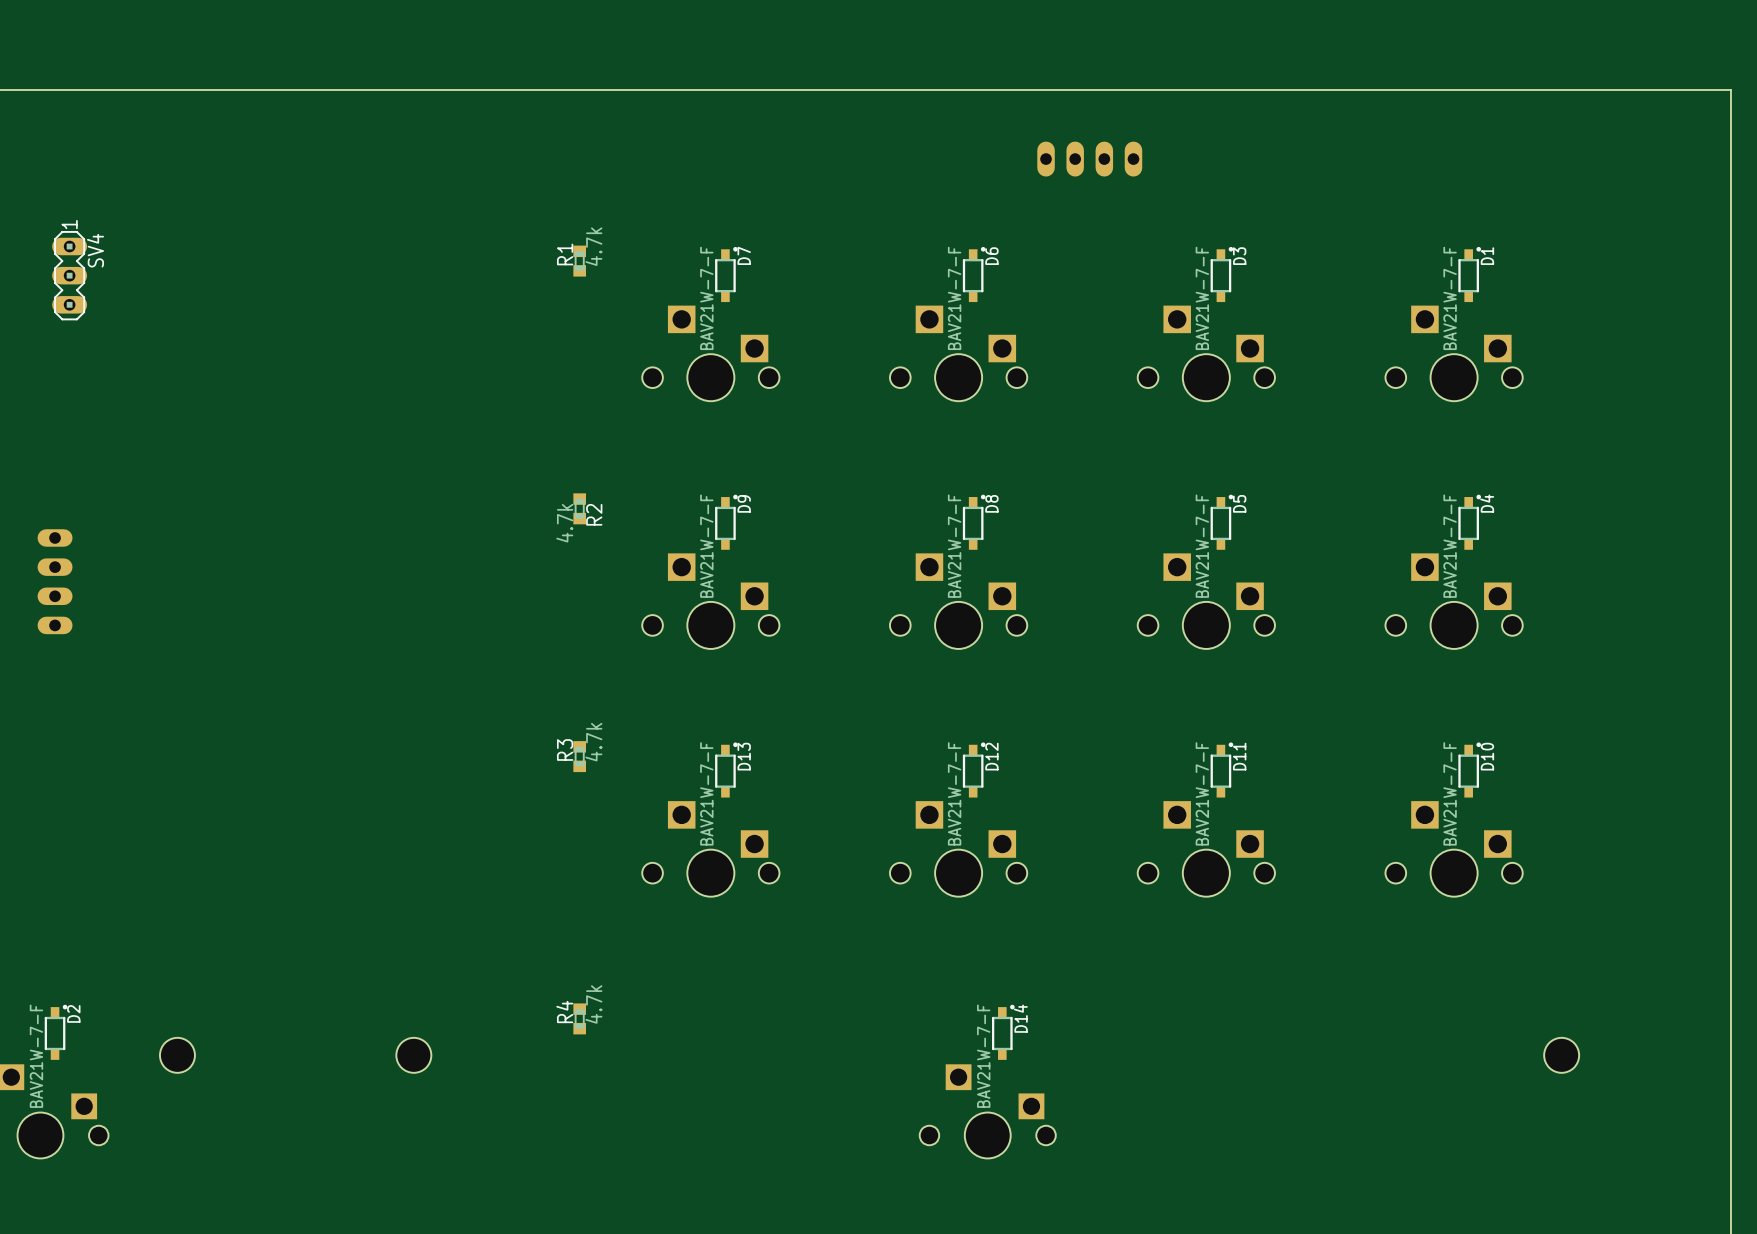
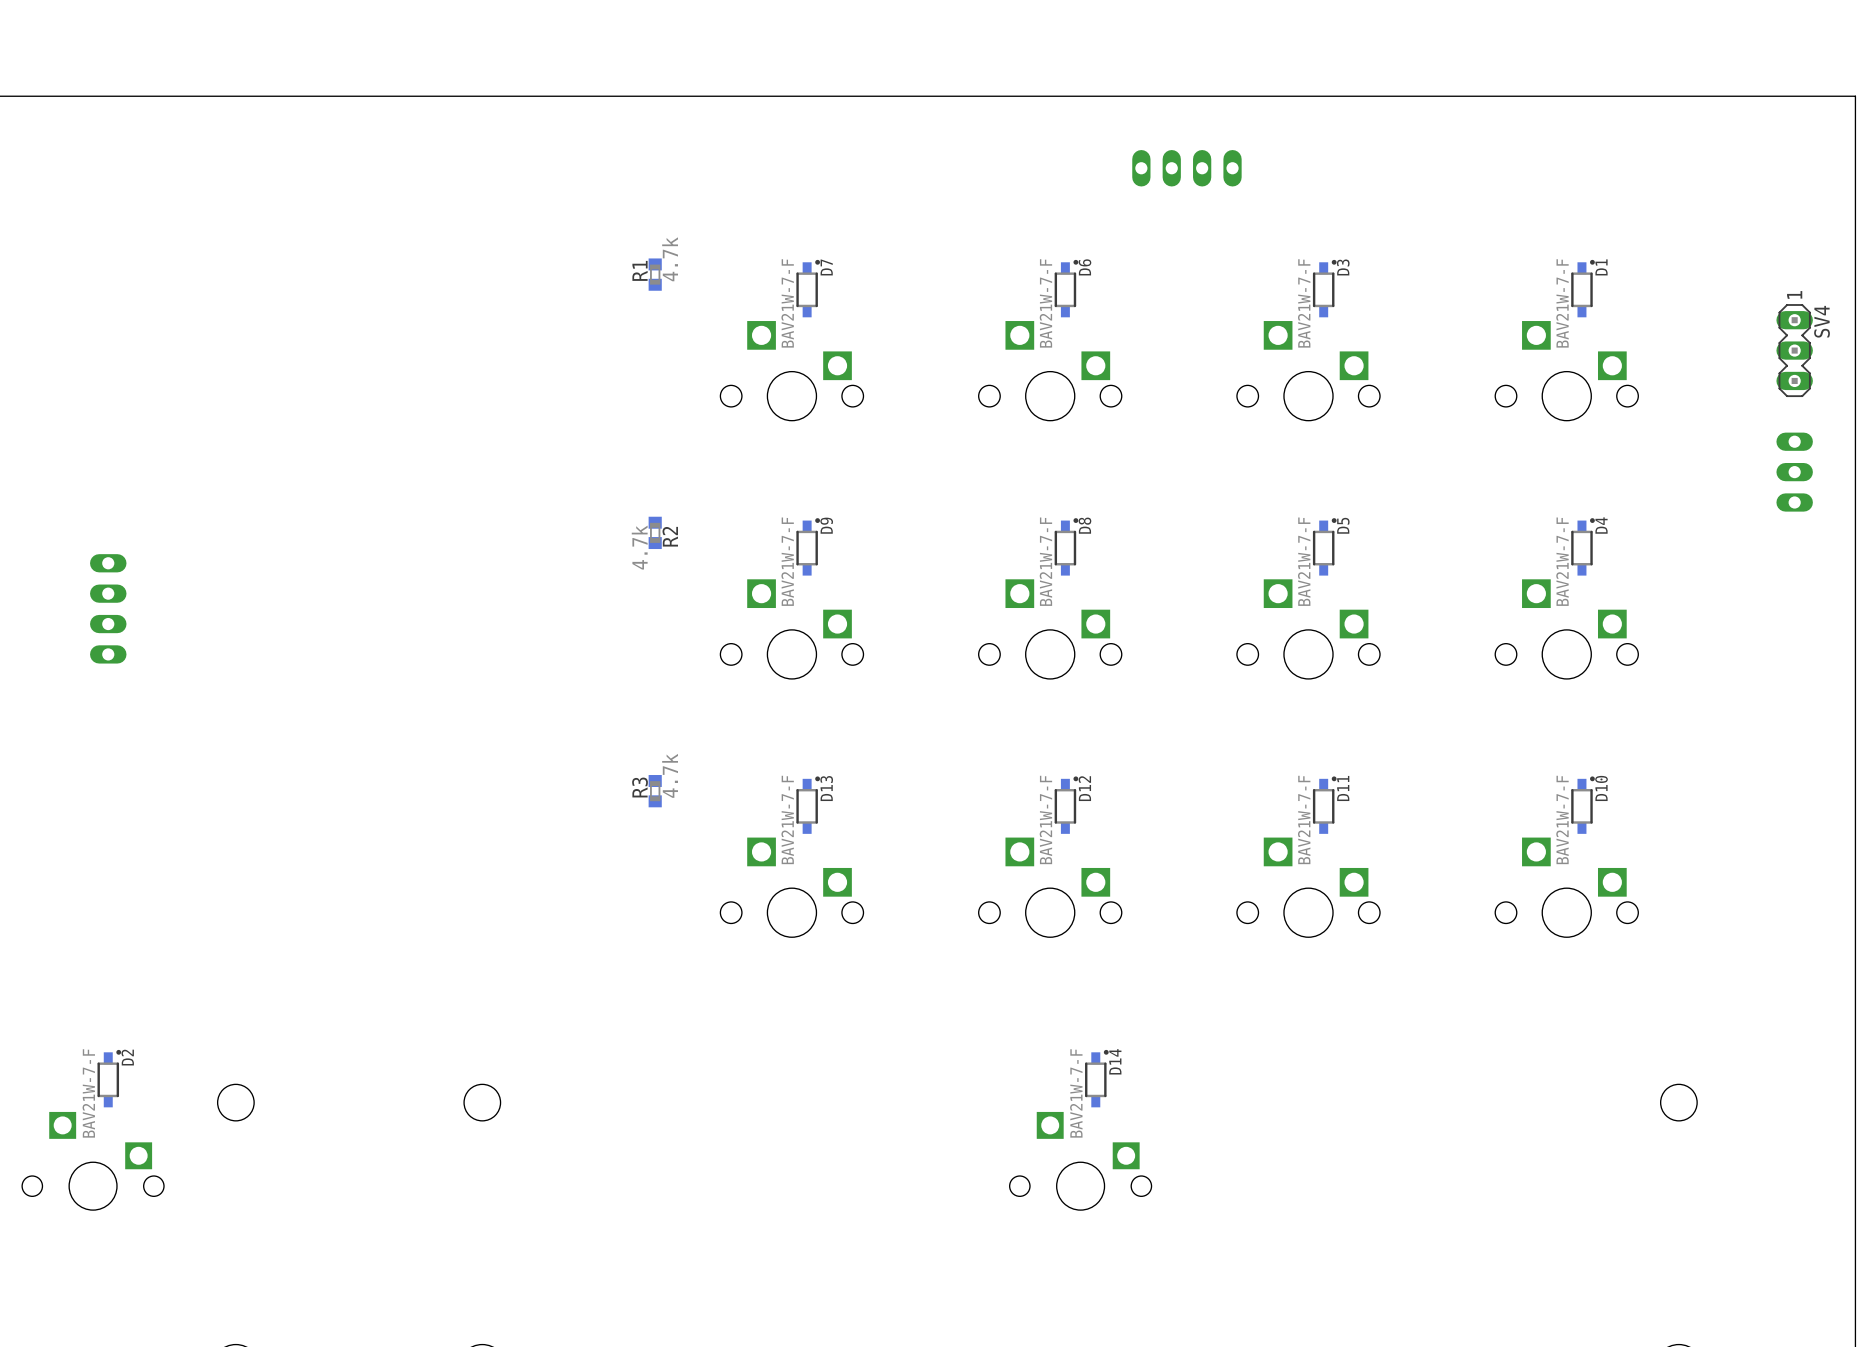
SV4 position: (69, 275) -> (1794, 350)
part: none -> (1794, 472)
R4: 4.7k (579, 1018) -> none

